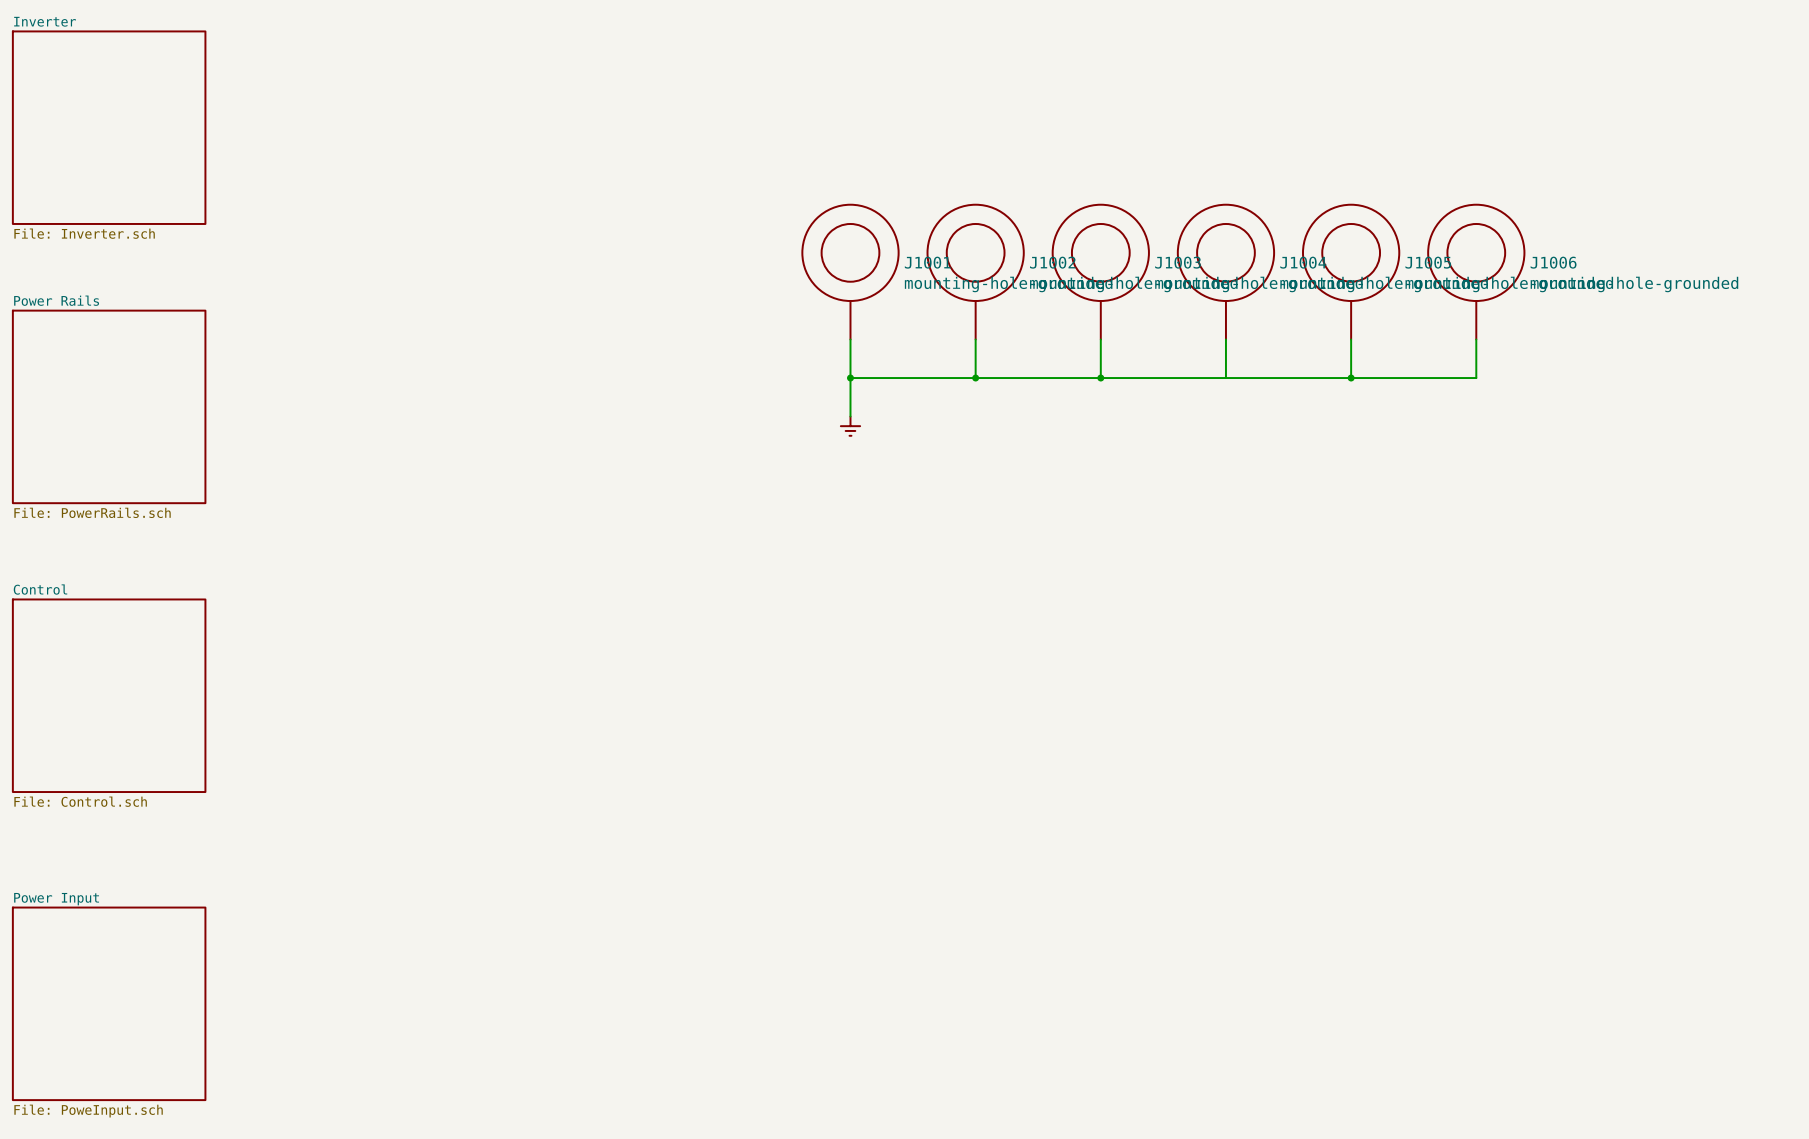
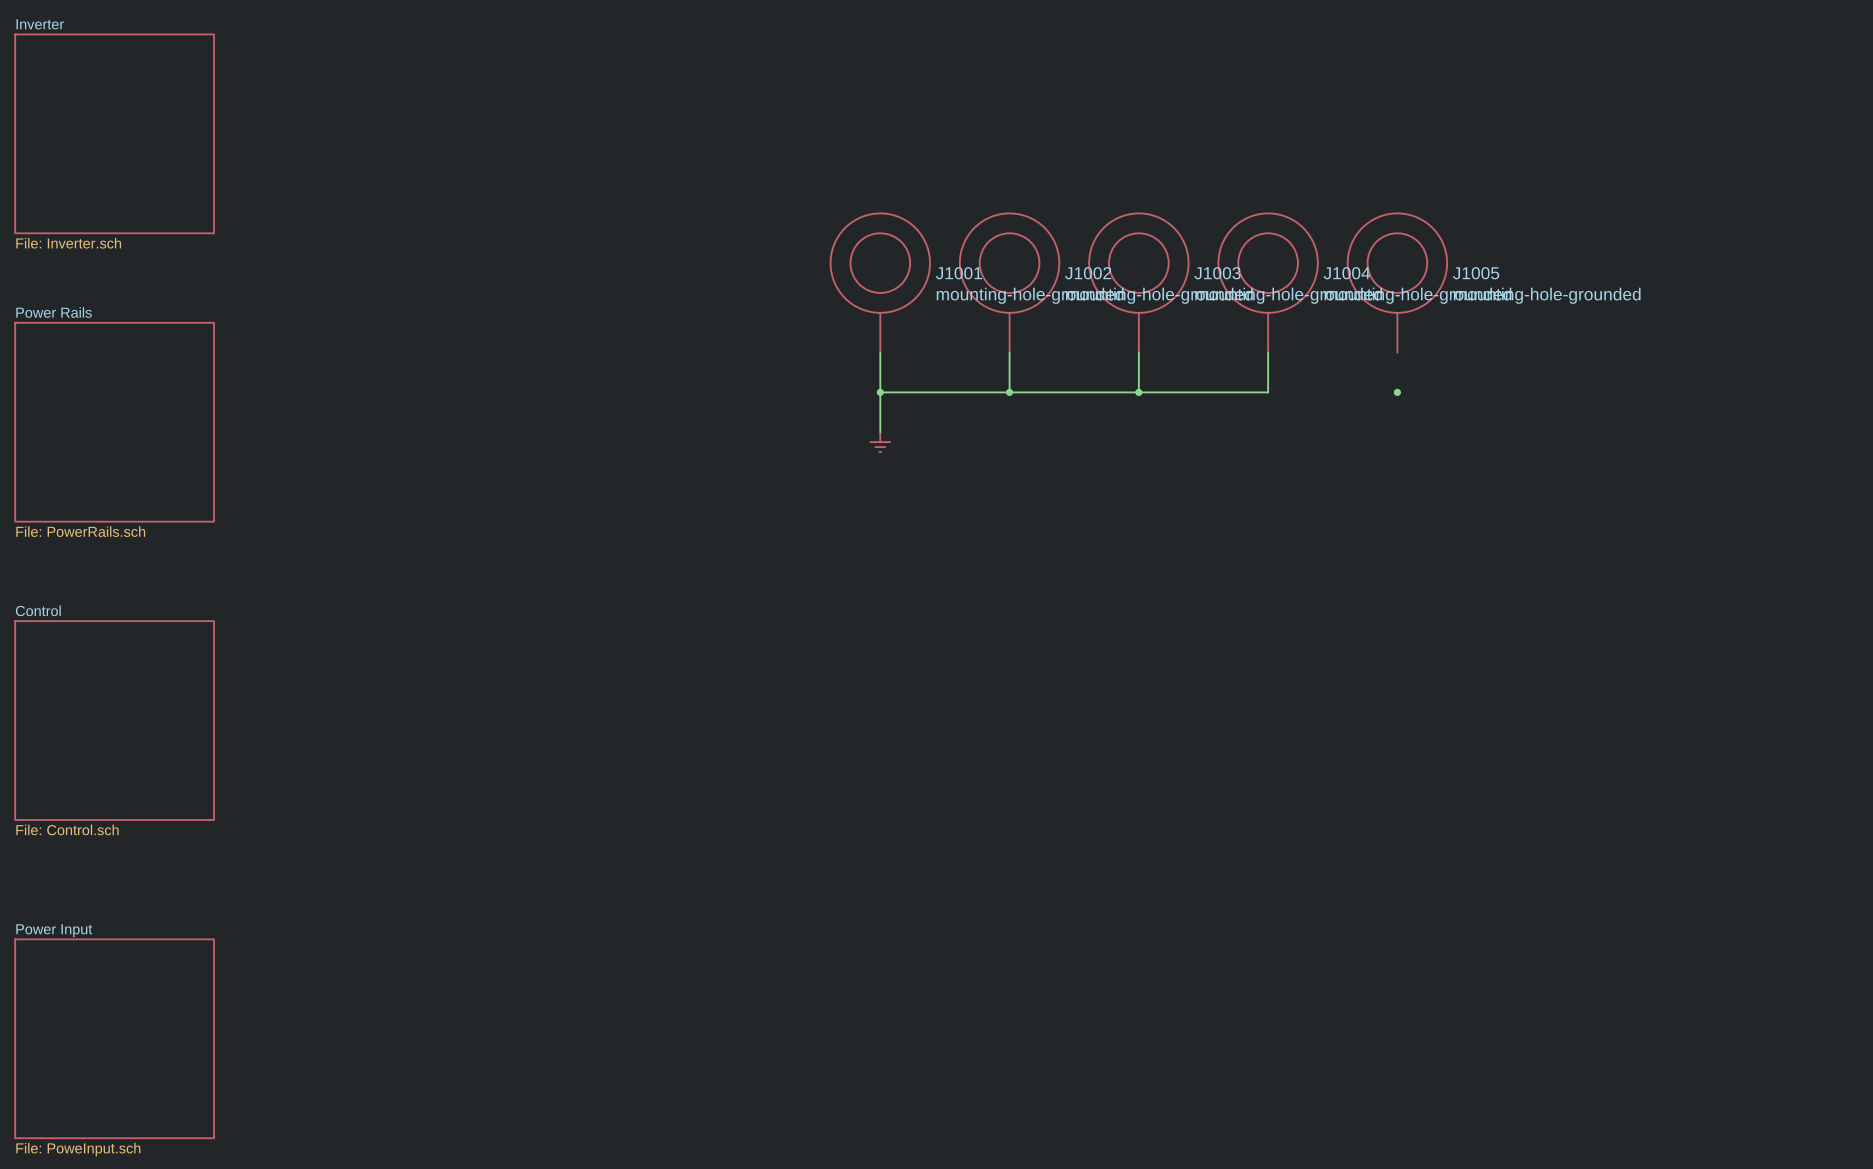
J1006: mounting-hole-grounded (1476, 272) -> none
wire: (1351, 339) (1351, 378) -> none
wire: (1476, 339) (1476, 378) (1225, 378) -> none

